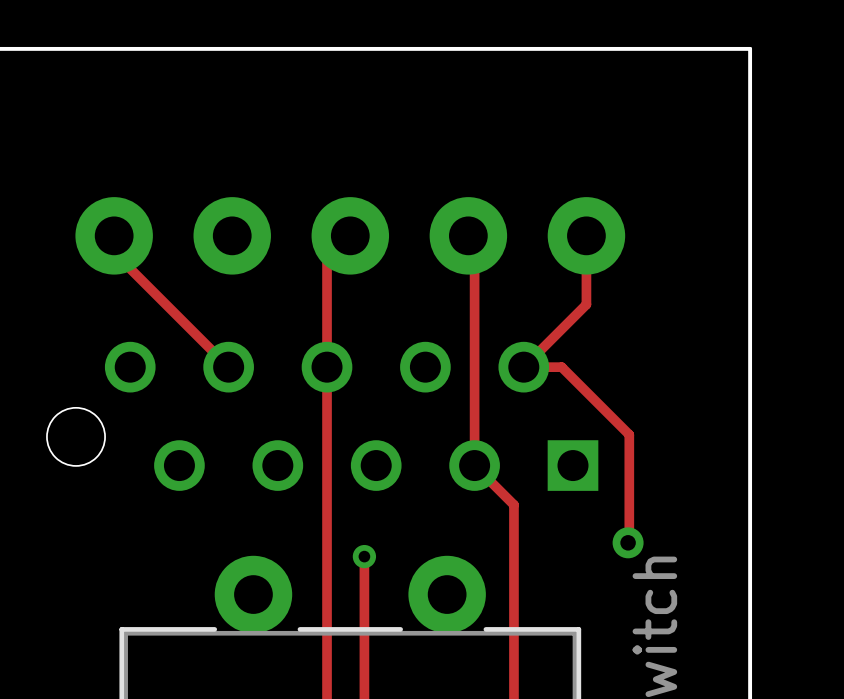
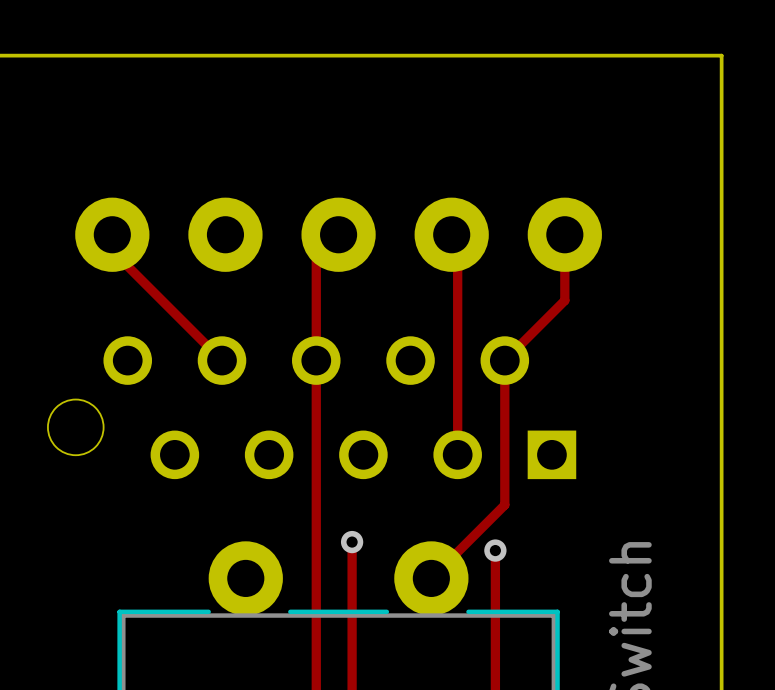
track: (523, 367) (561, 367) (629, 434) (628, 542) -> (504, 360) (504, 504) (431, 578)
track: (474, 465) (513, 504) (513, 565) -> none
via: (628, 542) -> none
via: none -> (495, 550)

